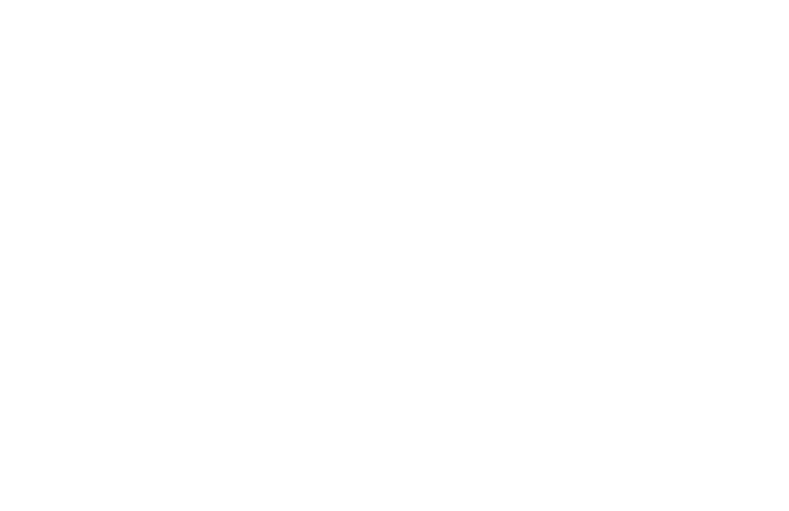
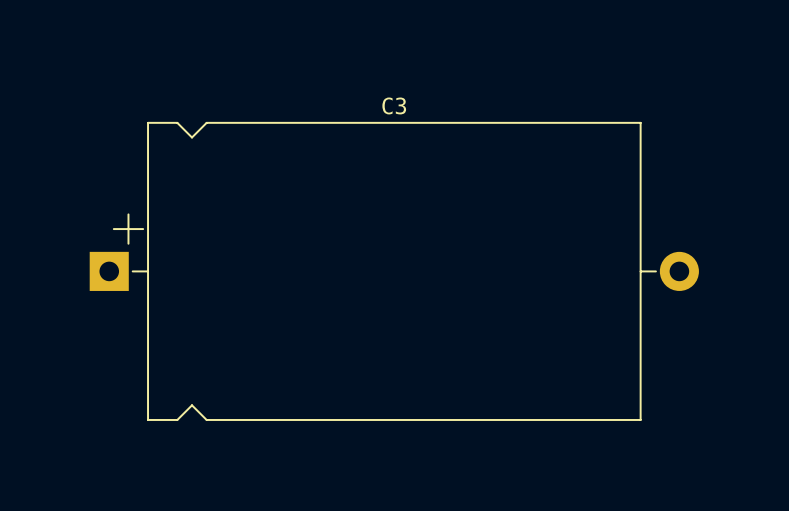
C3: none -> (394, 271)

